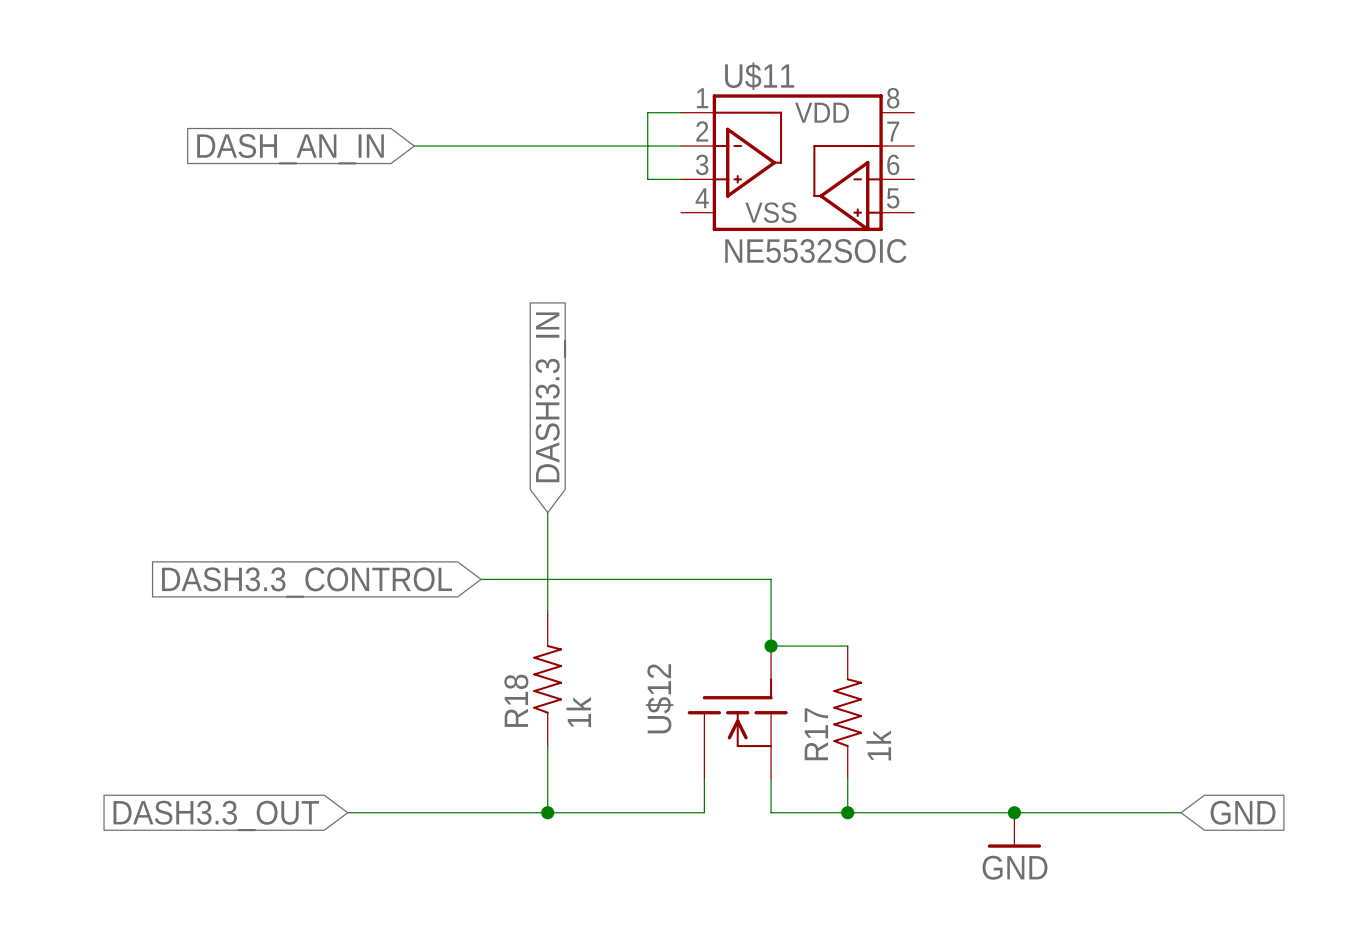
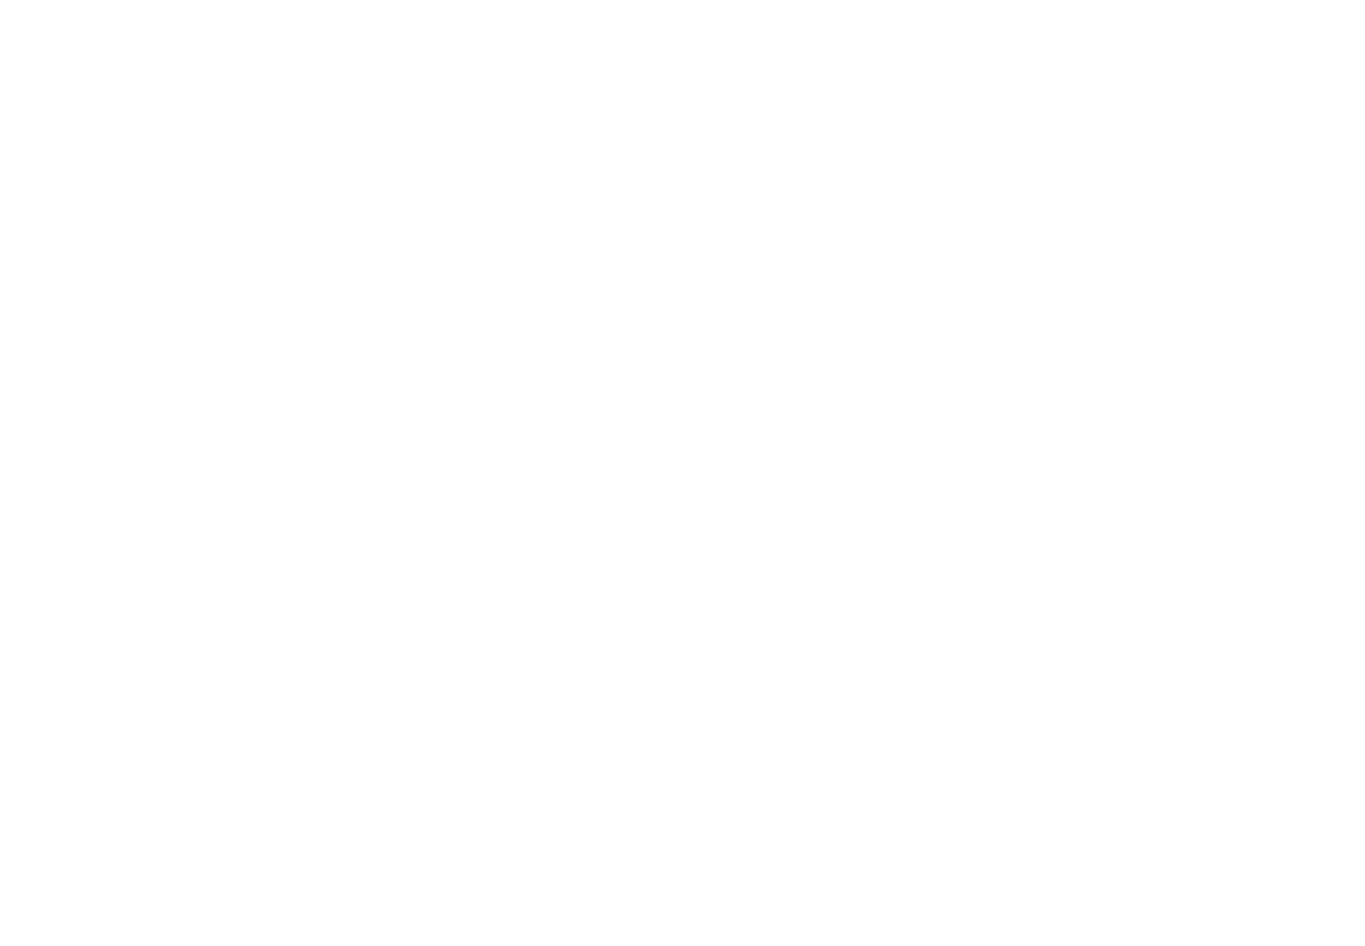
wire: (681, 112) (647, 112) (647, 179) (681, 179) -> none
wire: (414, 146) (681, 146) -> none
global label: DASH_AN_IN (290, 149) -> none
U$11: NE5532SOIC (797, 162) -> none
global label: DASH3.3_IN (550, 397) -> none
wire: (547, 512) (547, 612) -> none
wire: (481, 579) (771, 579) (771, 646) (847, 646) -> none
global label: DASH3.3_CONTROL (307, 582) -> none
junction: (771, 646) -> none
R18: 1k (547, 679) -> none
U$12: (737, 712) -> none
R17: 1k (847, 712) -> none
wire: (547, 746) (547, 812) -> none
wire: (704, 779) (704, 812) (347, 812) -> none
wire: (771, 779) (771, 812) (1181, 812) -> none
wire: (847, 779) (847, 812) -> none
junction: (547, 812) -> none
junction: (847, 812) -> none
junction: (1014, 812) -> none
global label: GND (1243, 812) -> none
global label: DASH3.3_OUT (216, 815) -> none
power symbol: GND (1014, 830) -> none

